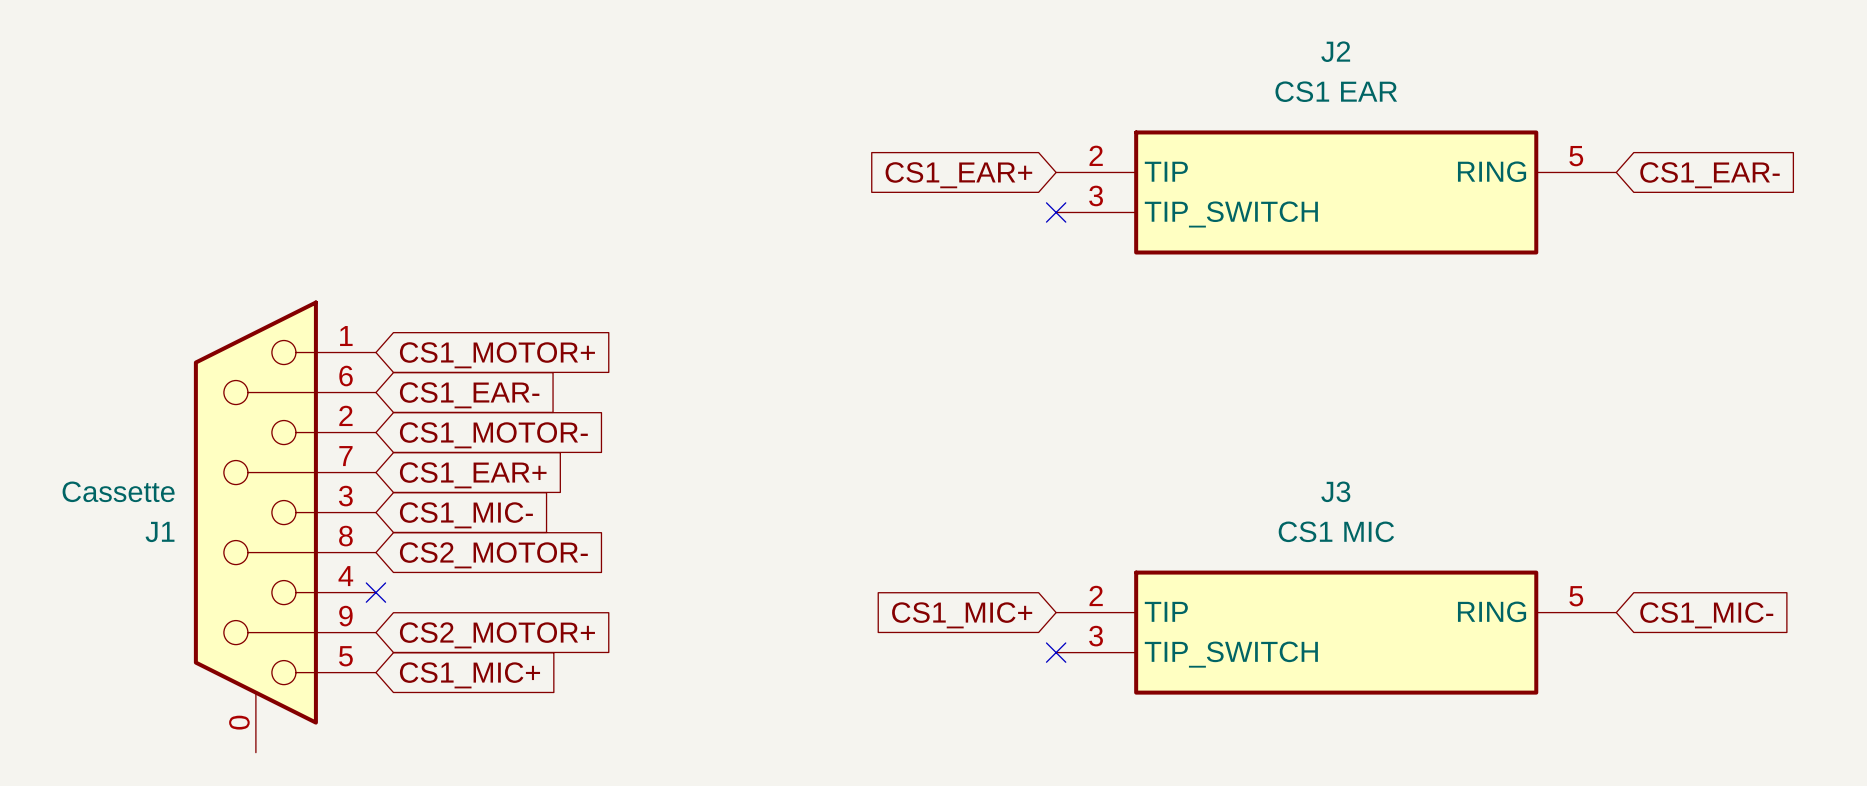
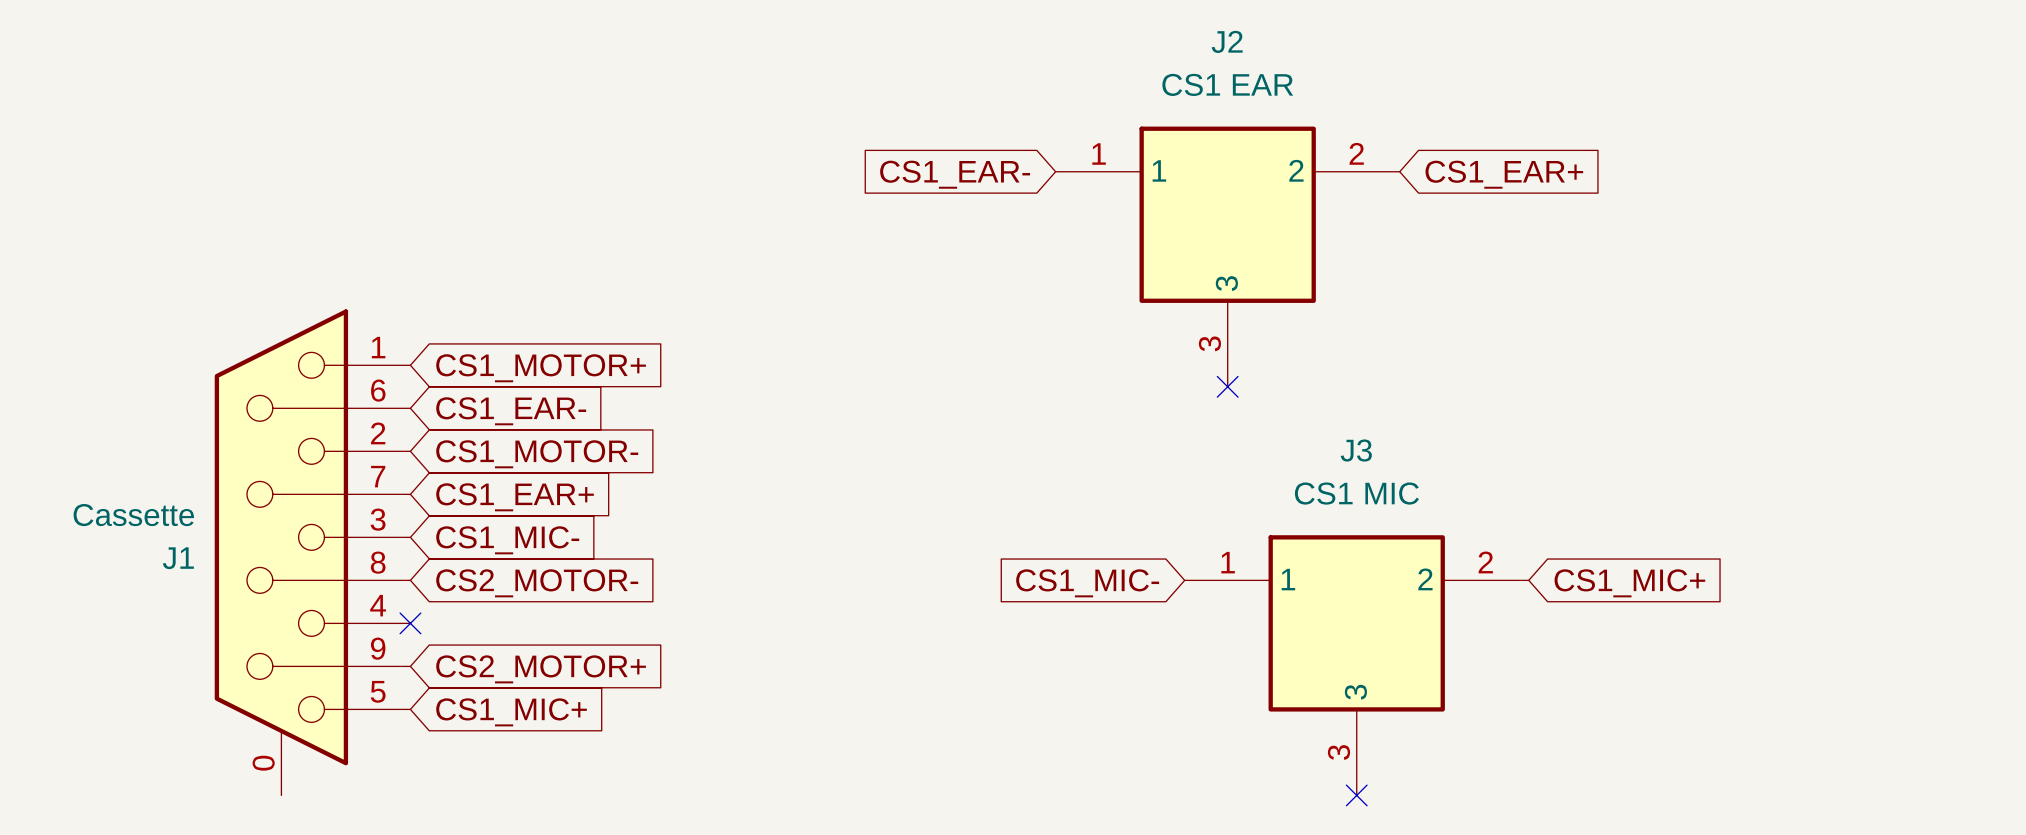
J2 name position: J2 (1335, 51) -> J2 (1227, 41)
J2 value position: CS1 EAR (1336, 91) -> CS1 EAR (1227, 84)
J2 symbol: [1056, 130, 1617, 255] -> [1055, 126, 1400, 387]
global label: none -> CS1_EAR- (955, 174)
global label rotation: 0° (958, 175) -> 180° (1504, 174)
global label position: CS1_EAR+ (958, 175) -> CS1_EAR+ (1504, 174)
global label: CS1_EAR- (1710, 175) -> none
no-connect mark: (1056, 212) -> none
no-connect mark: none -> (1227, 386)
J3 name position: J3 (1335, 491) -> J3 (1356, 450)
J3 value position: CS1 MIC (1336, 531) -> CS1 MIC (1356, 493)
global label: none -> CS1_MIC- (1087, 583)
J3 symbol: [1056, 570, 1617, 695] -> [1184, 535, 1529, 796]
global label rotation: 0° (962, 615) -> 180° (1629, 583)
global label position: CS1_MIC+ (962, 615) -> CS1_MIC+ (1629, 583)
global label: CS1_MIC- (1706, 615) -> none
no-connect mark: (1056, 652) -> none
no-connect mark: none -> (1356, 795)

